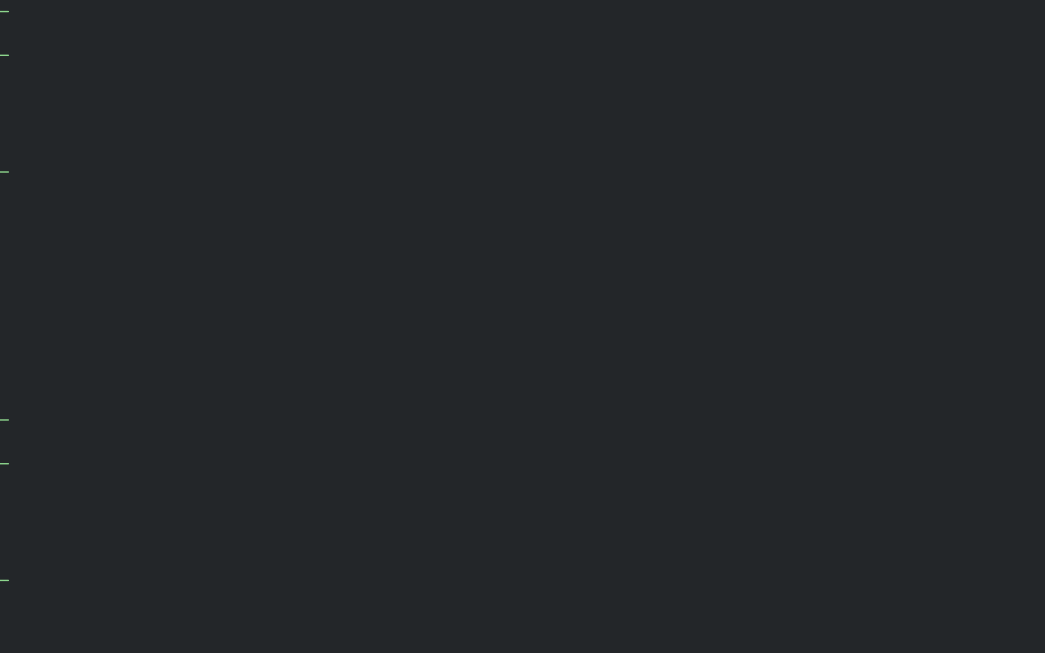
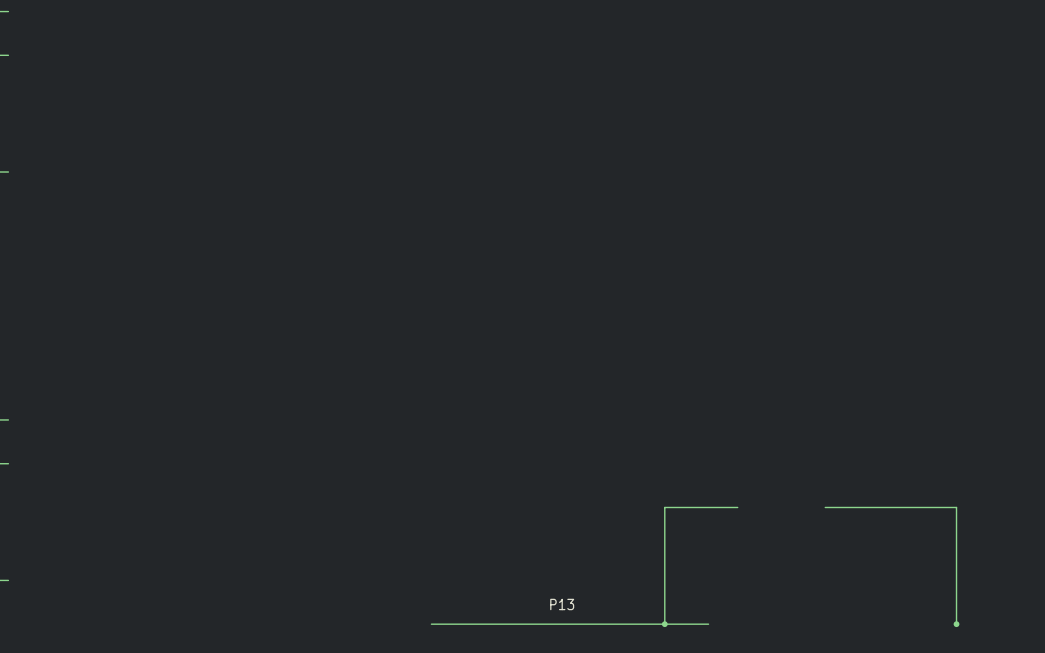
wire: none -> (737, 507) (664, 507) (664, 624)
wire: none -> (825, 507) (956, 507) (956, 624)
label: none -> P13 (562, 604)
wire: none -> (431, 624) (708, 624)
junction: none -> (664, 624)
junction: none -> (956, 624)

